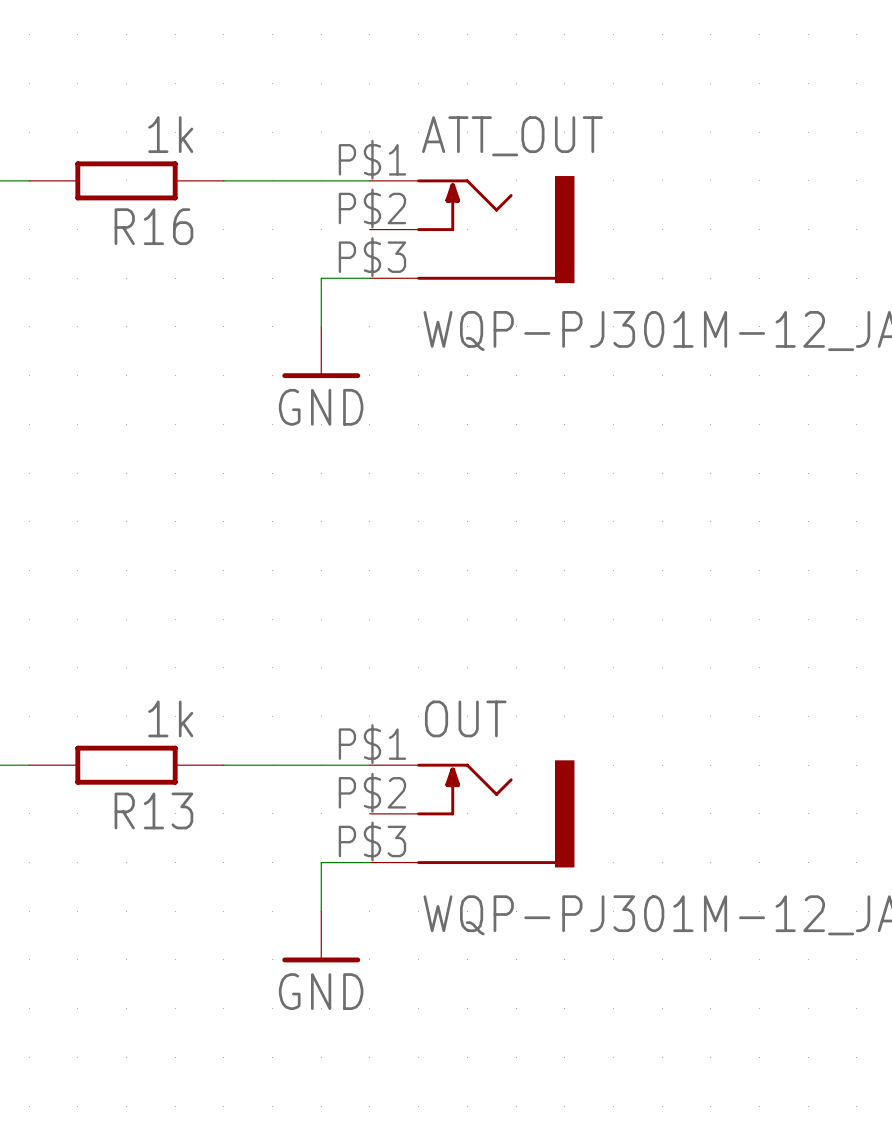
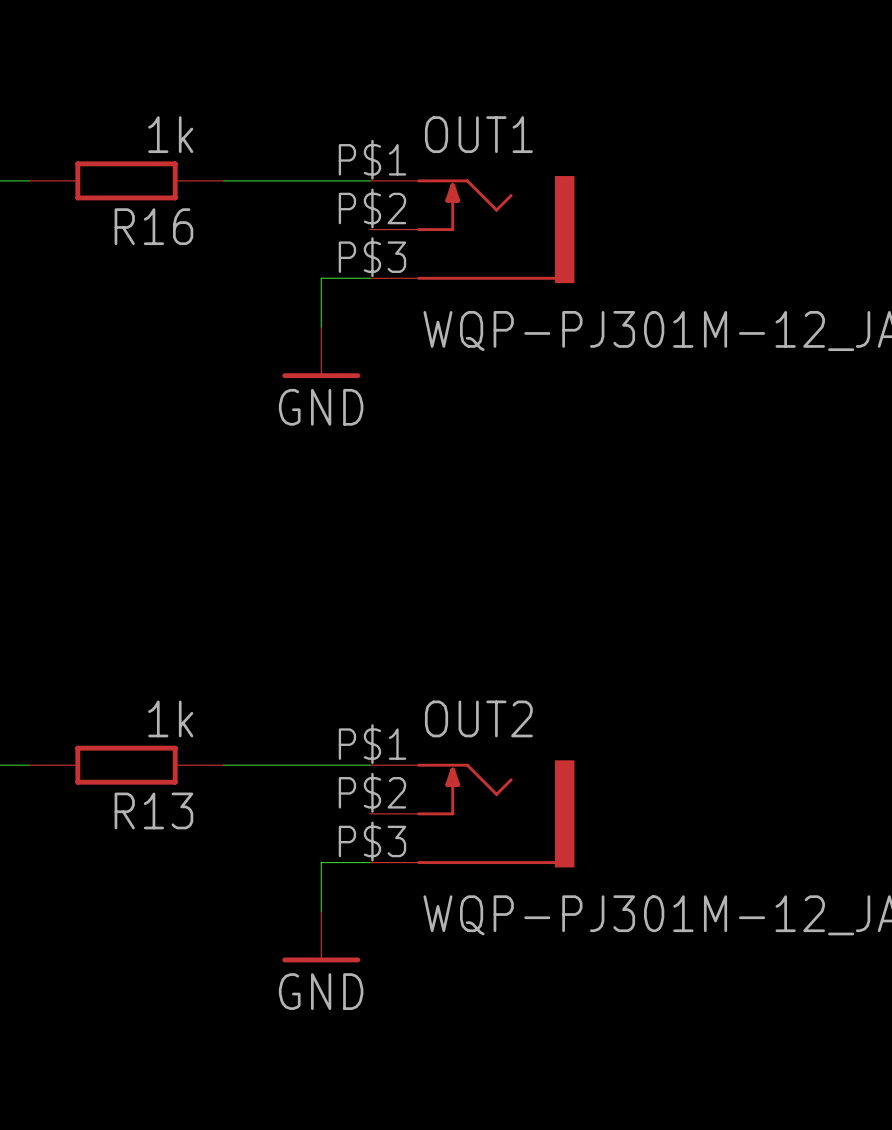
ATT_OUT name: ATT_OUT (512, 136) -> OUT1 (478, 134)
OUT name: OUT (465, 718) -> OUT2 (478, 718)

